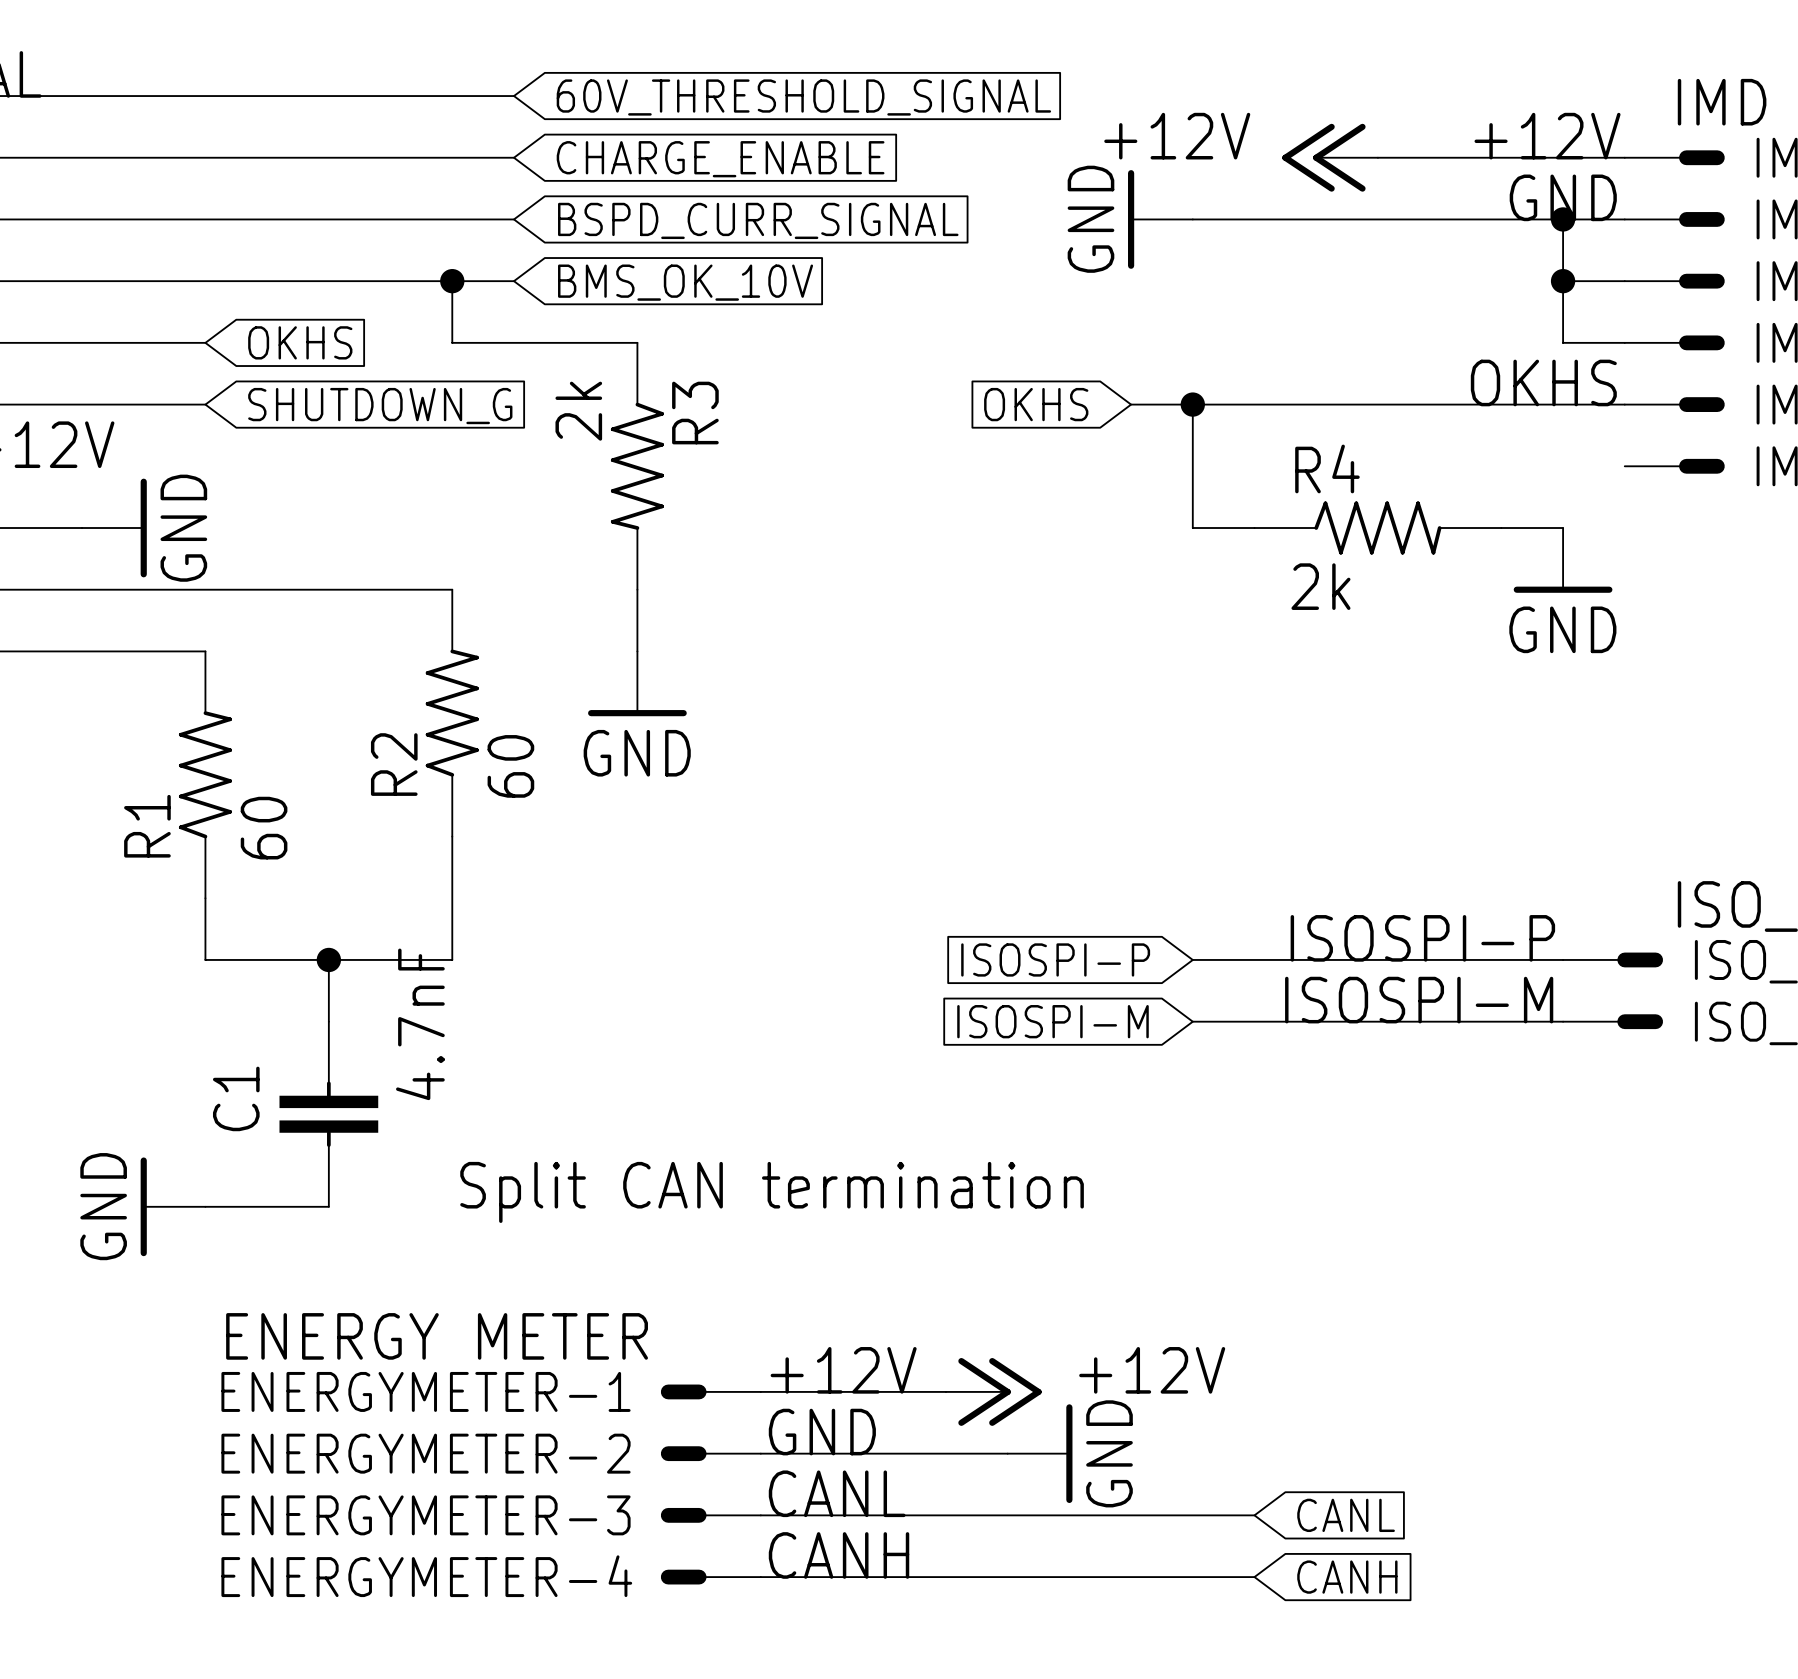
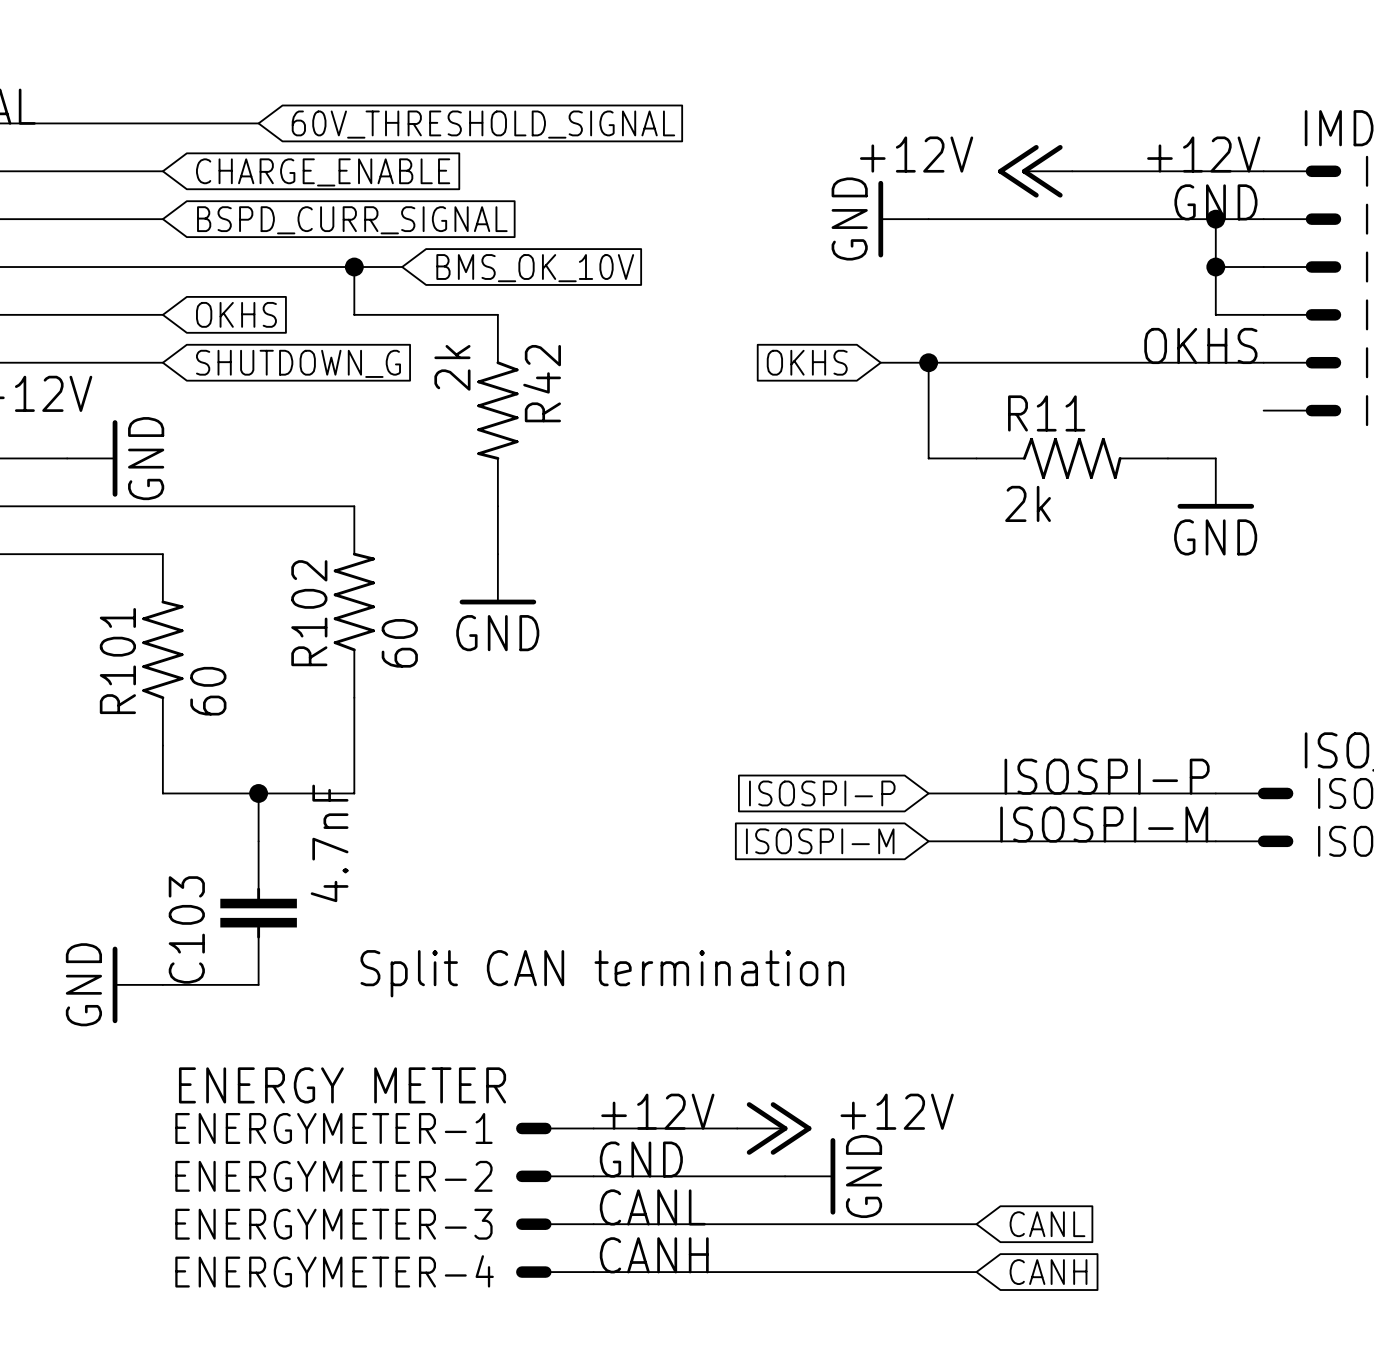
wire: (328, 96) (513, 96) -> none
global label position: 60V_THRESHOLD_SIGNAL (803, 97) -> 60V_THRESHOLD_SIGNAL (483, 124)
wire: (205, 157) (513, 157) -> none
global label position: CHARGE_ENABLE (720, 159) -> CHARGE_ENABLE (323, 172)
wire: (205, 219) (513, 219) -> none
global label position: BSPD_CURR_SIGNAL (758, 220) -> BSPD_CURR_SIGNAL (352, 220)
R3 name: R3 (695, 413) -> R42 (542, 383)
R4 name: R4 (1327, 468) -> R11 (1046, 413)
R2 name: R2 (394, 764) -> R102 (309, 613)
R1 name: R1 (147, 826) -> R101 (117, 661)
C1 name: C1 (236, 1098) -> C103 (186, 929)

